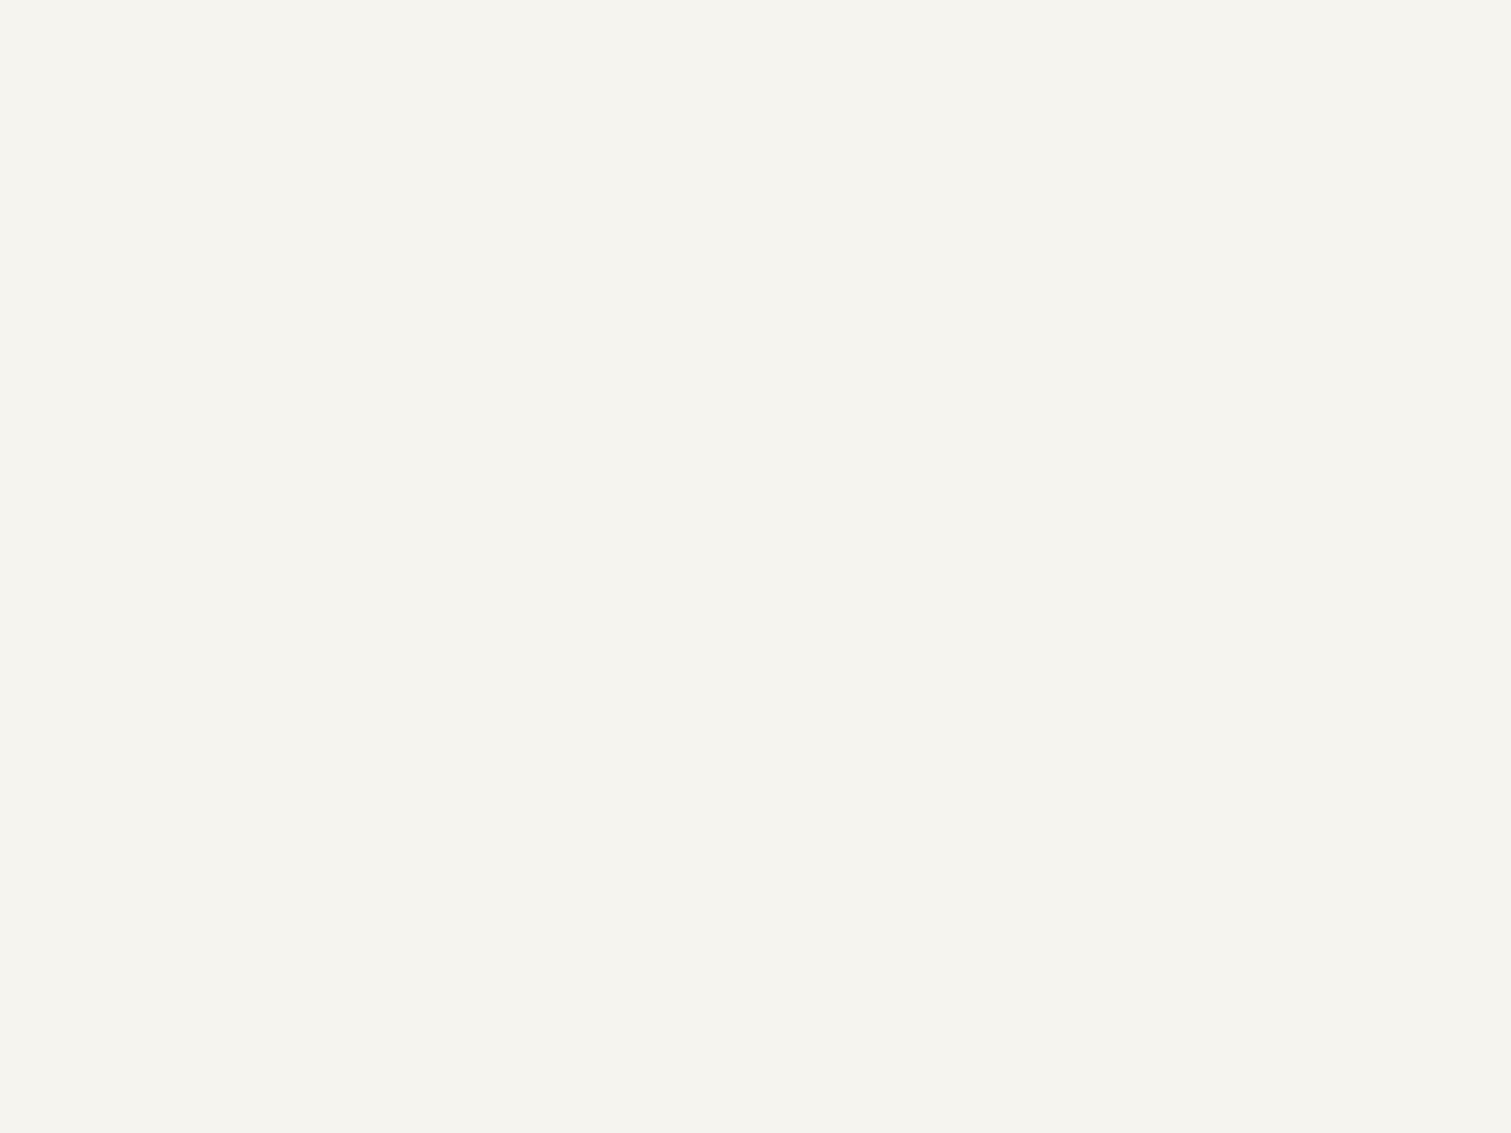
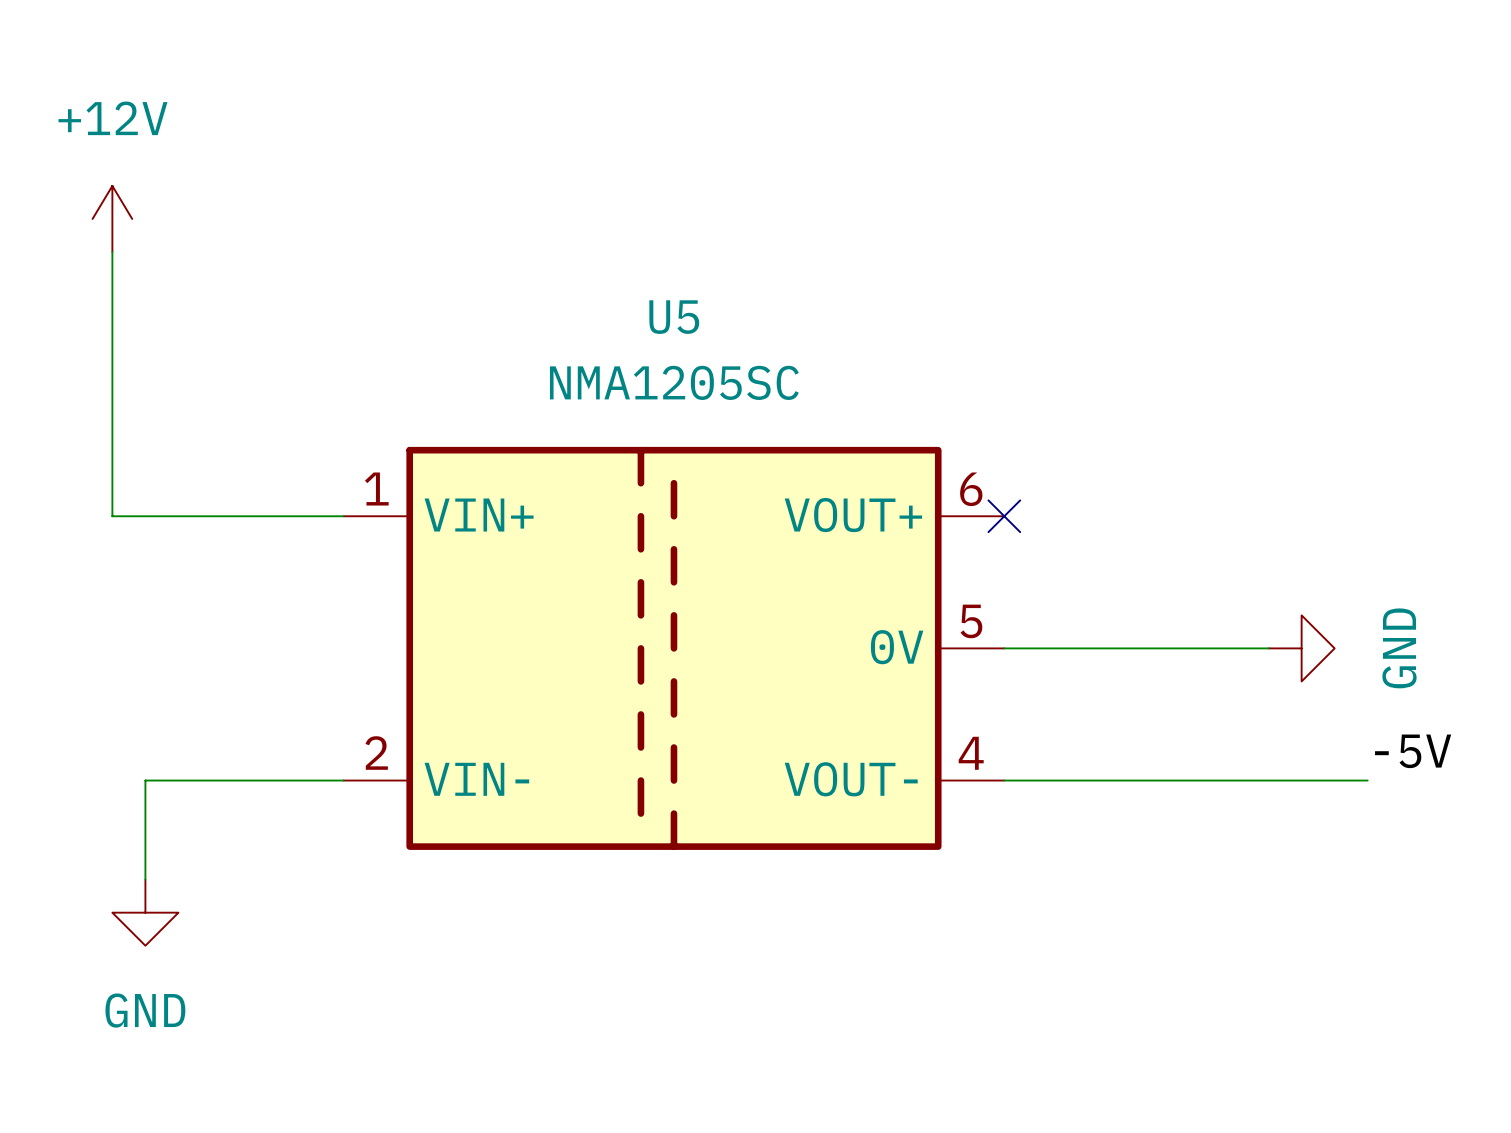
power symbol: none -> +12V (112, 218)
wire: none -> (112, 251) (112, 516) (343, 516)
no-connect mark: none -> (1004, 516)
U5: none -> NMA1205SC (673, 648)
wire: none -> (1004, 648) (1268, 648)
power symbol: none -> GND (1301, 648)
label: none -> -5V (1413, 751)
wire: none -> (343, 780) (145, 780) (145, 879)
wire: none -> (1004, 780) (1367, 780)
power symbol: none -> GND (145, 912)

